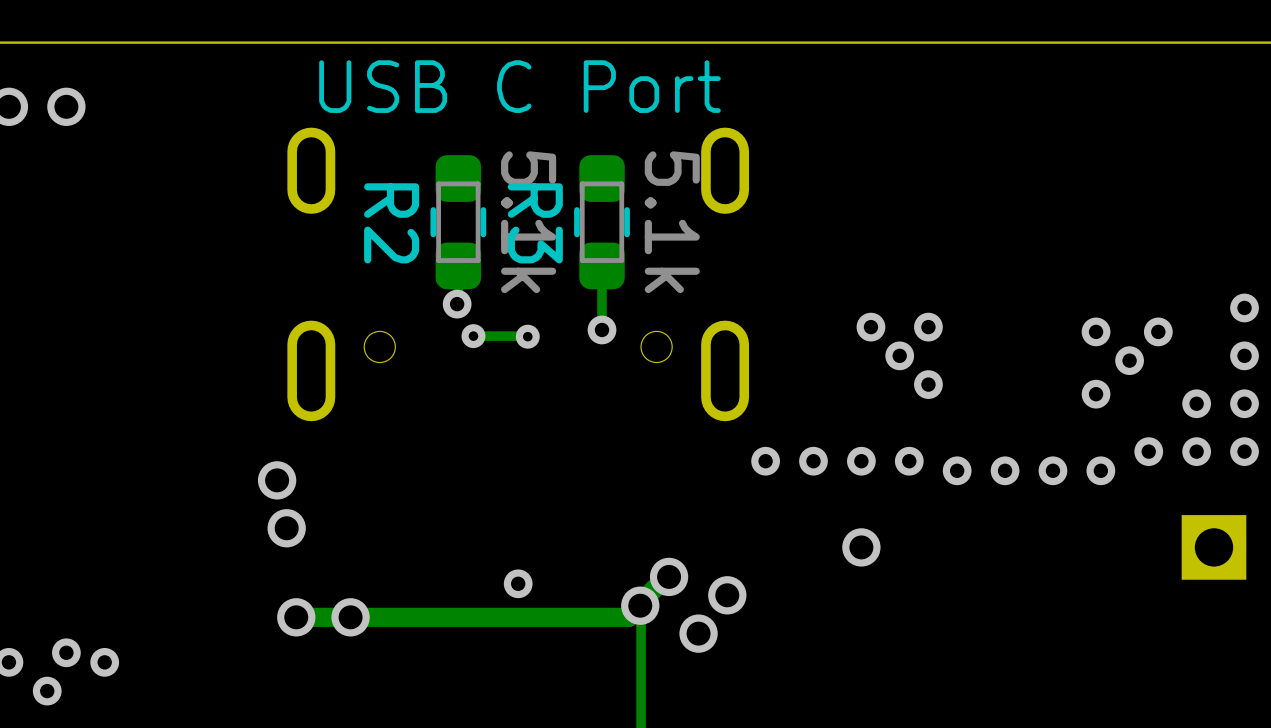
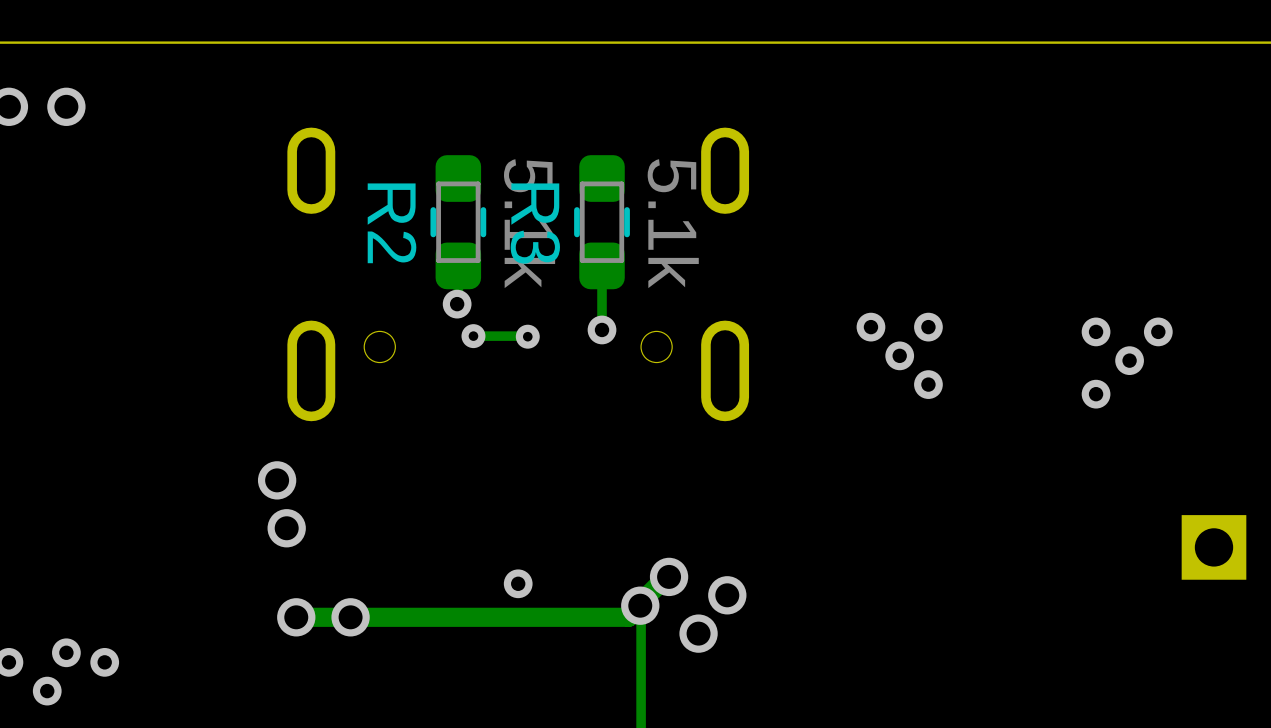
text: USB C Port (519, 86) -> none
via: (1244, 307) -> none
via: (1244, 355) -> none
via: (1196, 403) -> none
via: (1244, 403) -> none
via: (1148, 451) -> none
via: (1196, 451) -> none
via: (1244, 451) -> none
via: (765, 461) -> none
via: (813, 461) -> none
via: (861, 461) -> none
via: (909, 461) -> none
via: (957, 470) -> none
via: (1005, 470) -> none
via: (1052, 470) -> none
via: (1100, 470) -> none
via: (861, 547) -> none

